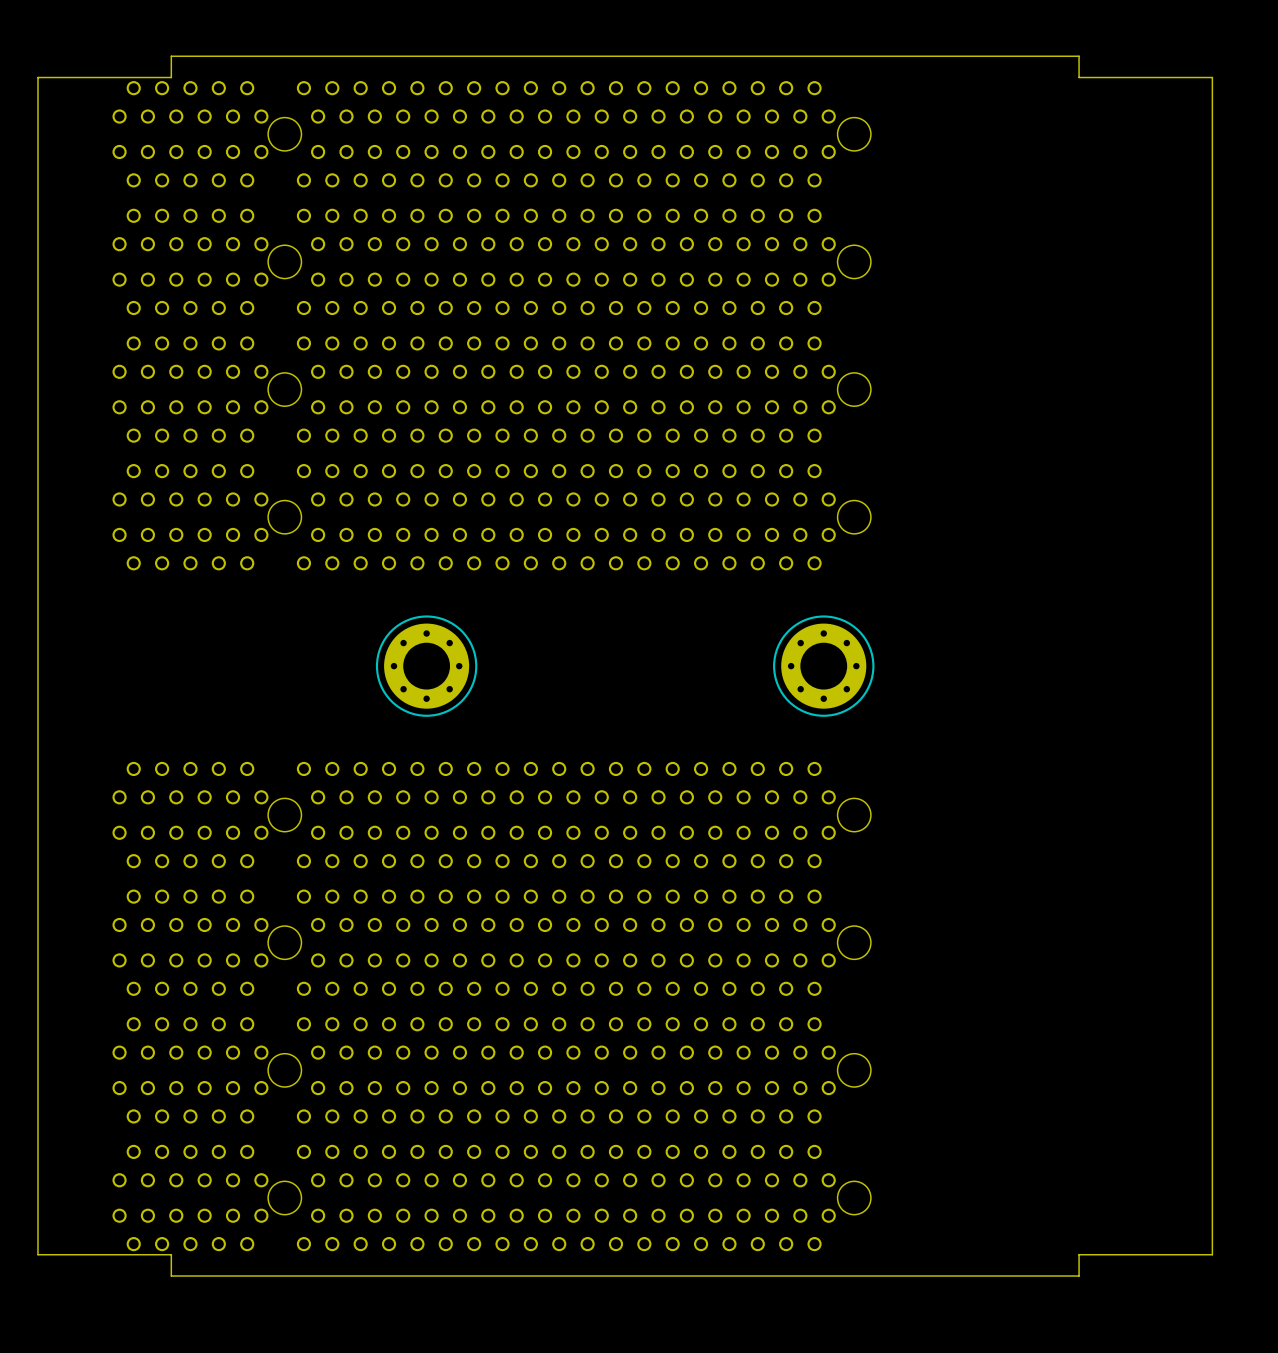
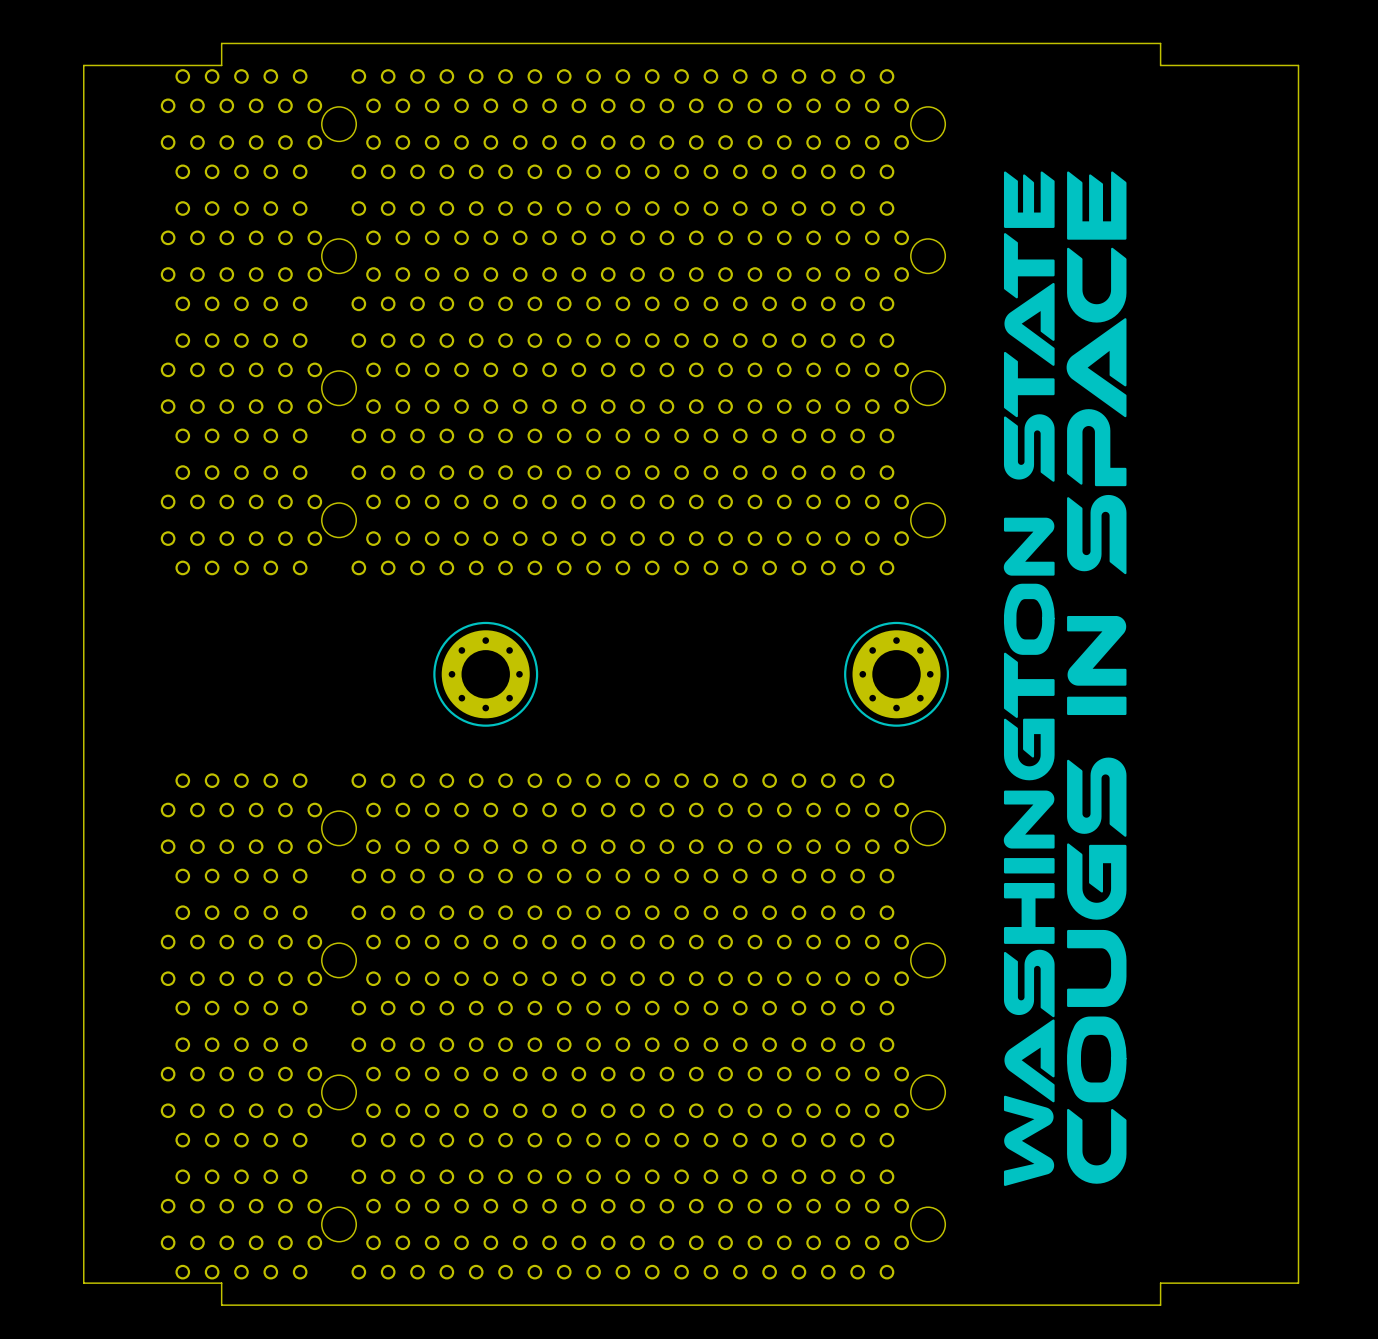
drawing: none -> [1003, 171, 1127, 1186]

